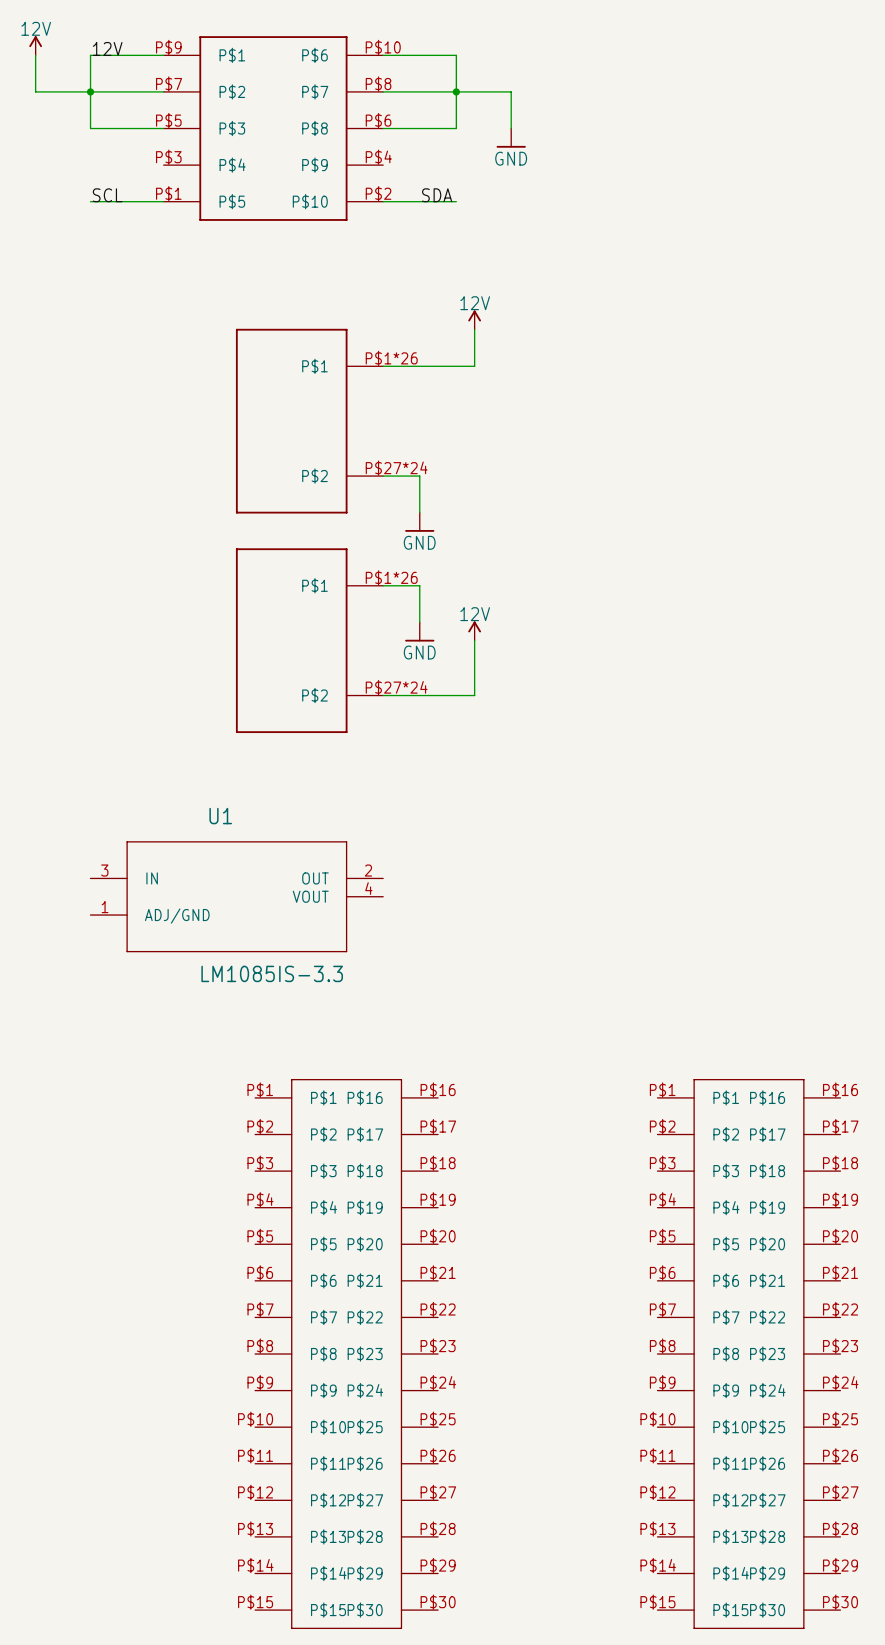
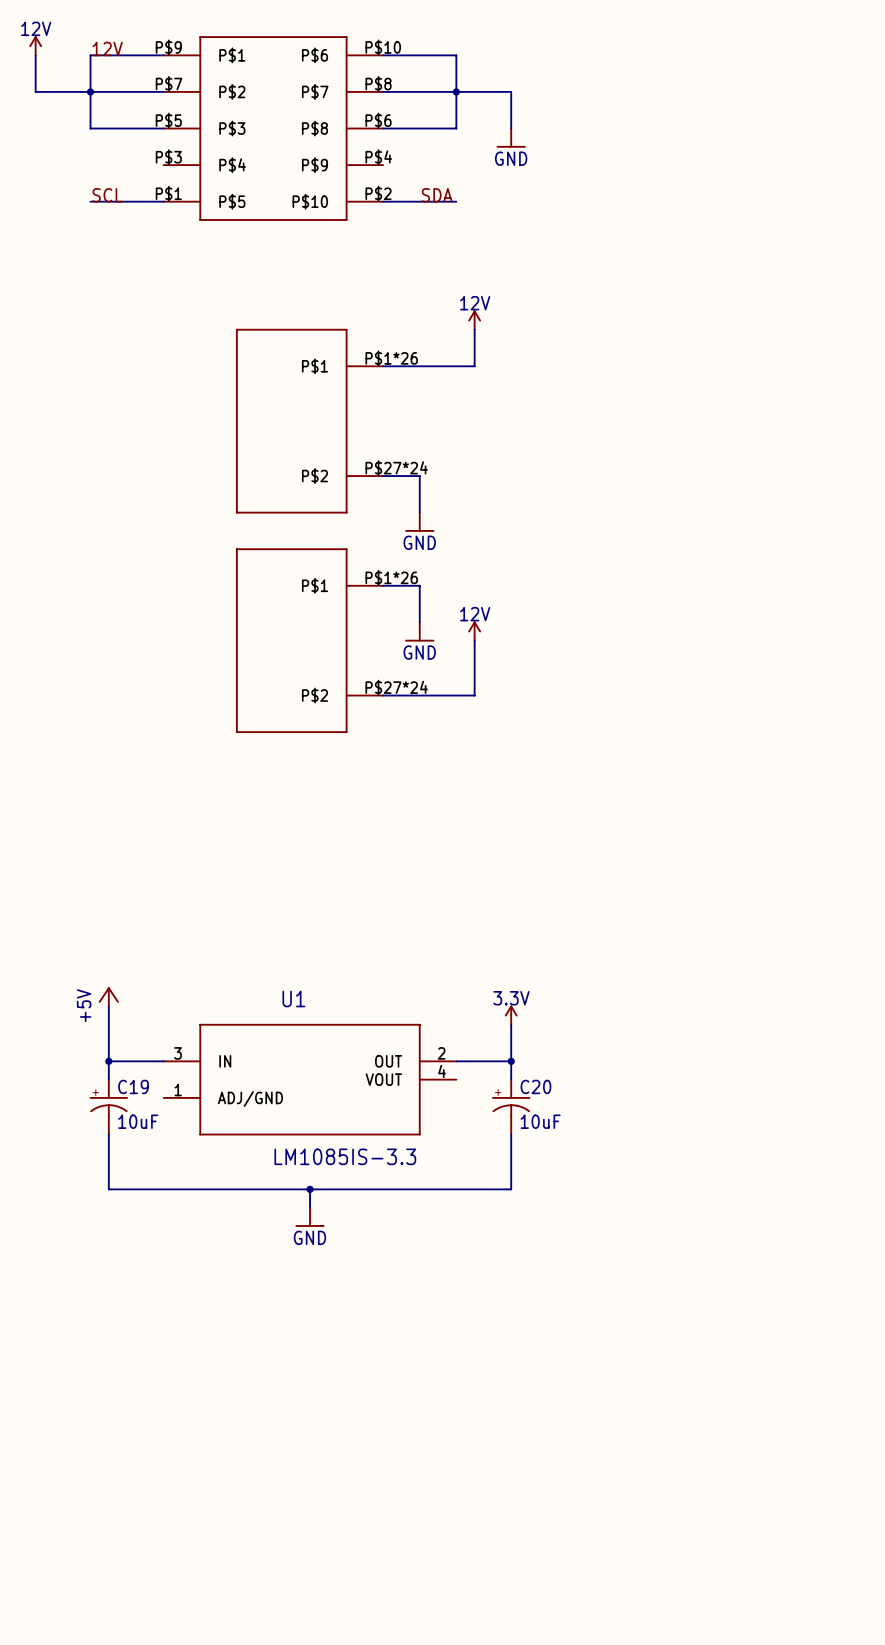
U1 position: (236, 896) -> (310, 1079)
power symbol: none -> +5V (108, 996)
wire: none -> (108, 1006) (108, 1079)
power symbol: none -> 3.3V (511, 1015)
wire: none -> (511, 1024) (511, 1079)
wire: none -> (108, 1061) (163, 1061)
junction: none -> (108, 1061)
wire: none -> (456, 1061) (511, 1061)
junction: none -> (511, 1061)
C19: none -> 10uF (108, 1107)
C20: none -> 10uF (511, 1107)
wire: none -> (108, 1134) (108, 1189) (511, 1189) (511, 1134)
wire: none -> (310, 1189) (310, 1207)
junction: none -> (310, 1189)
power symbol: none -> GND (310, 1217)
part: (346, 1354) -> none
part: (748, 1354) -> none

